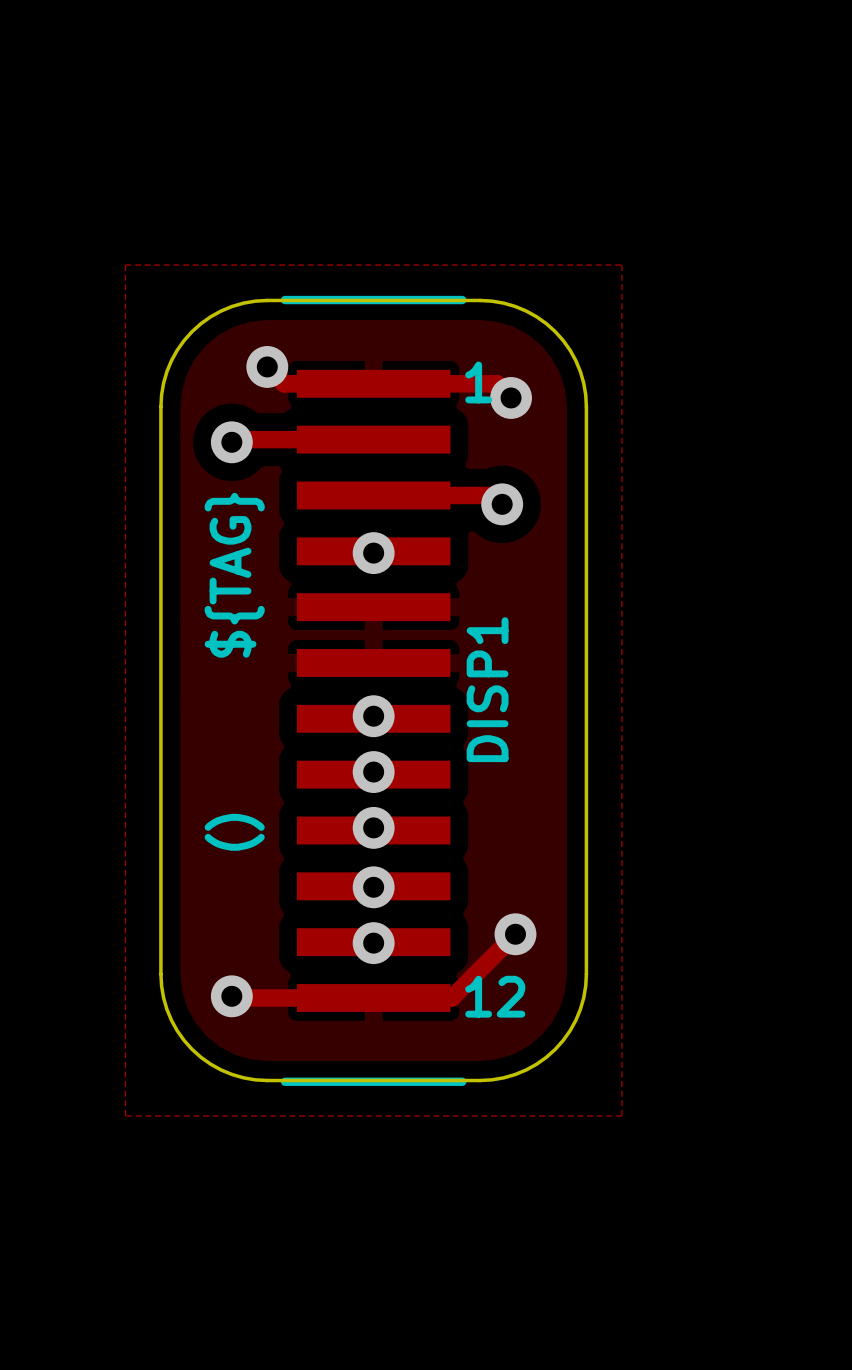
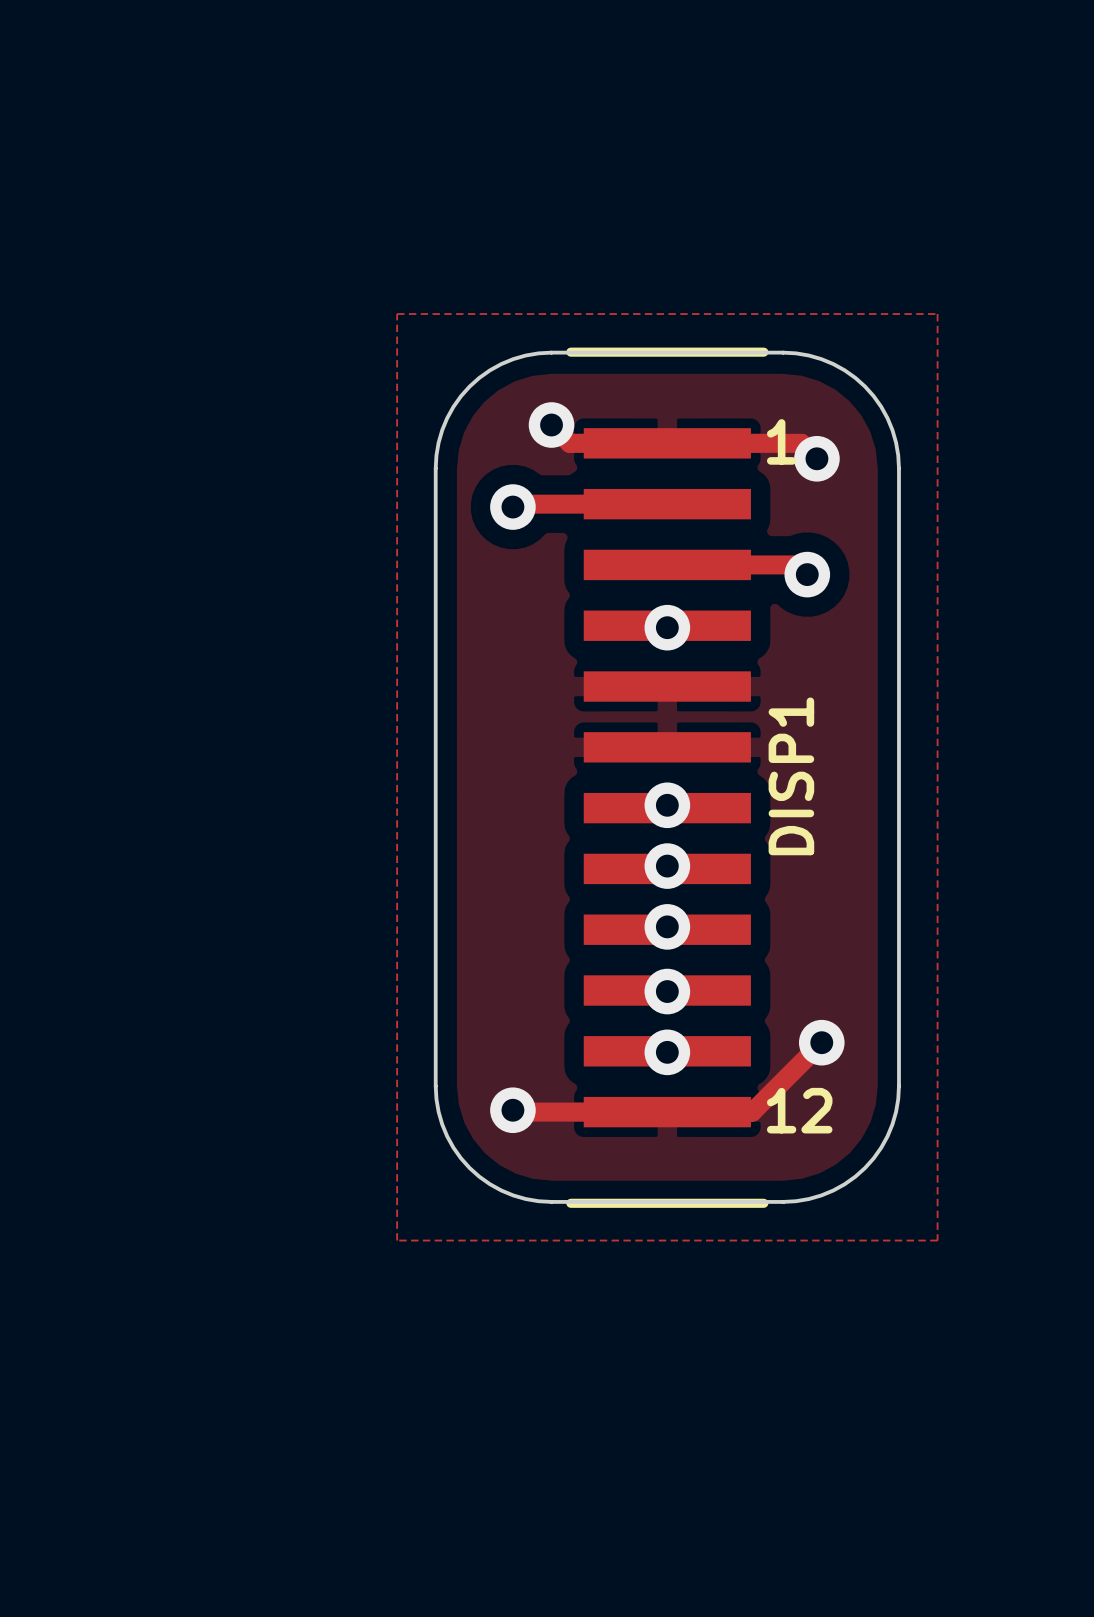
text: ${TAG} (234, 575) -> none
text: () (234, 832) -> none

